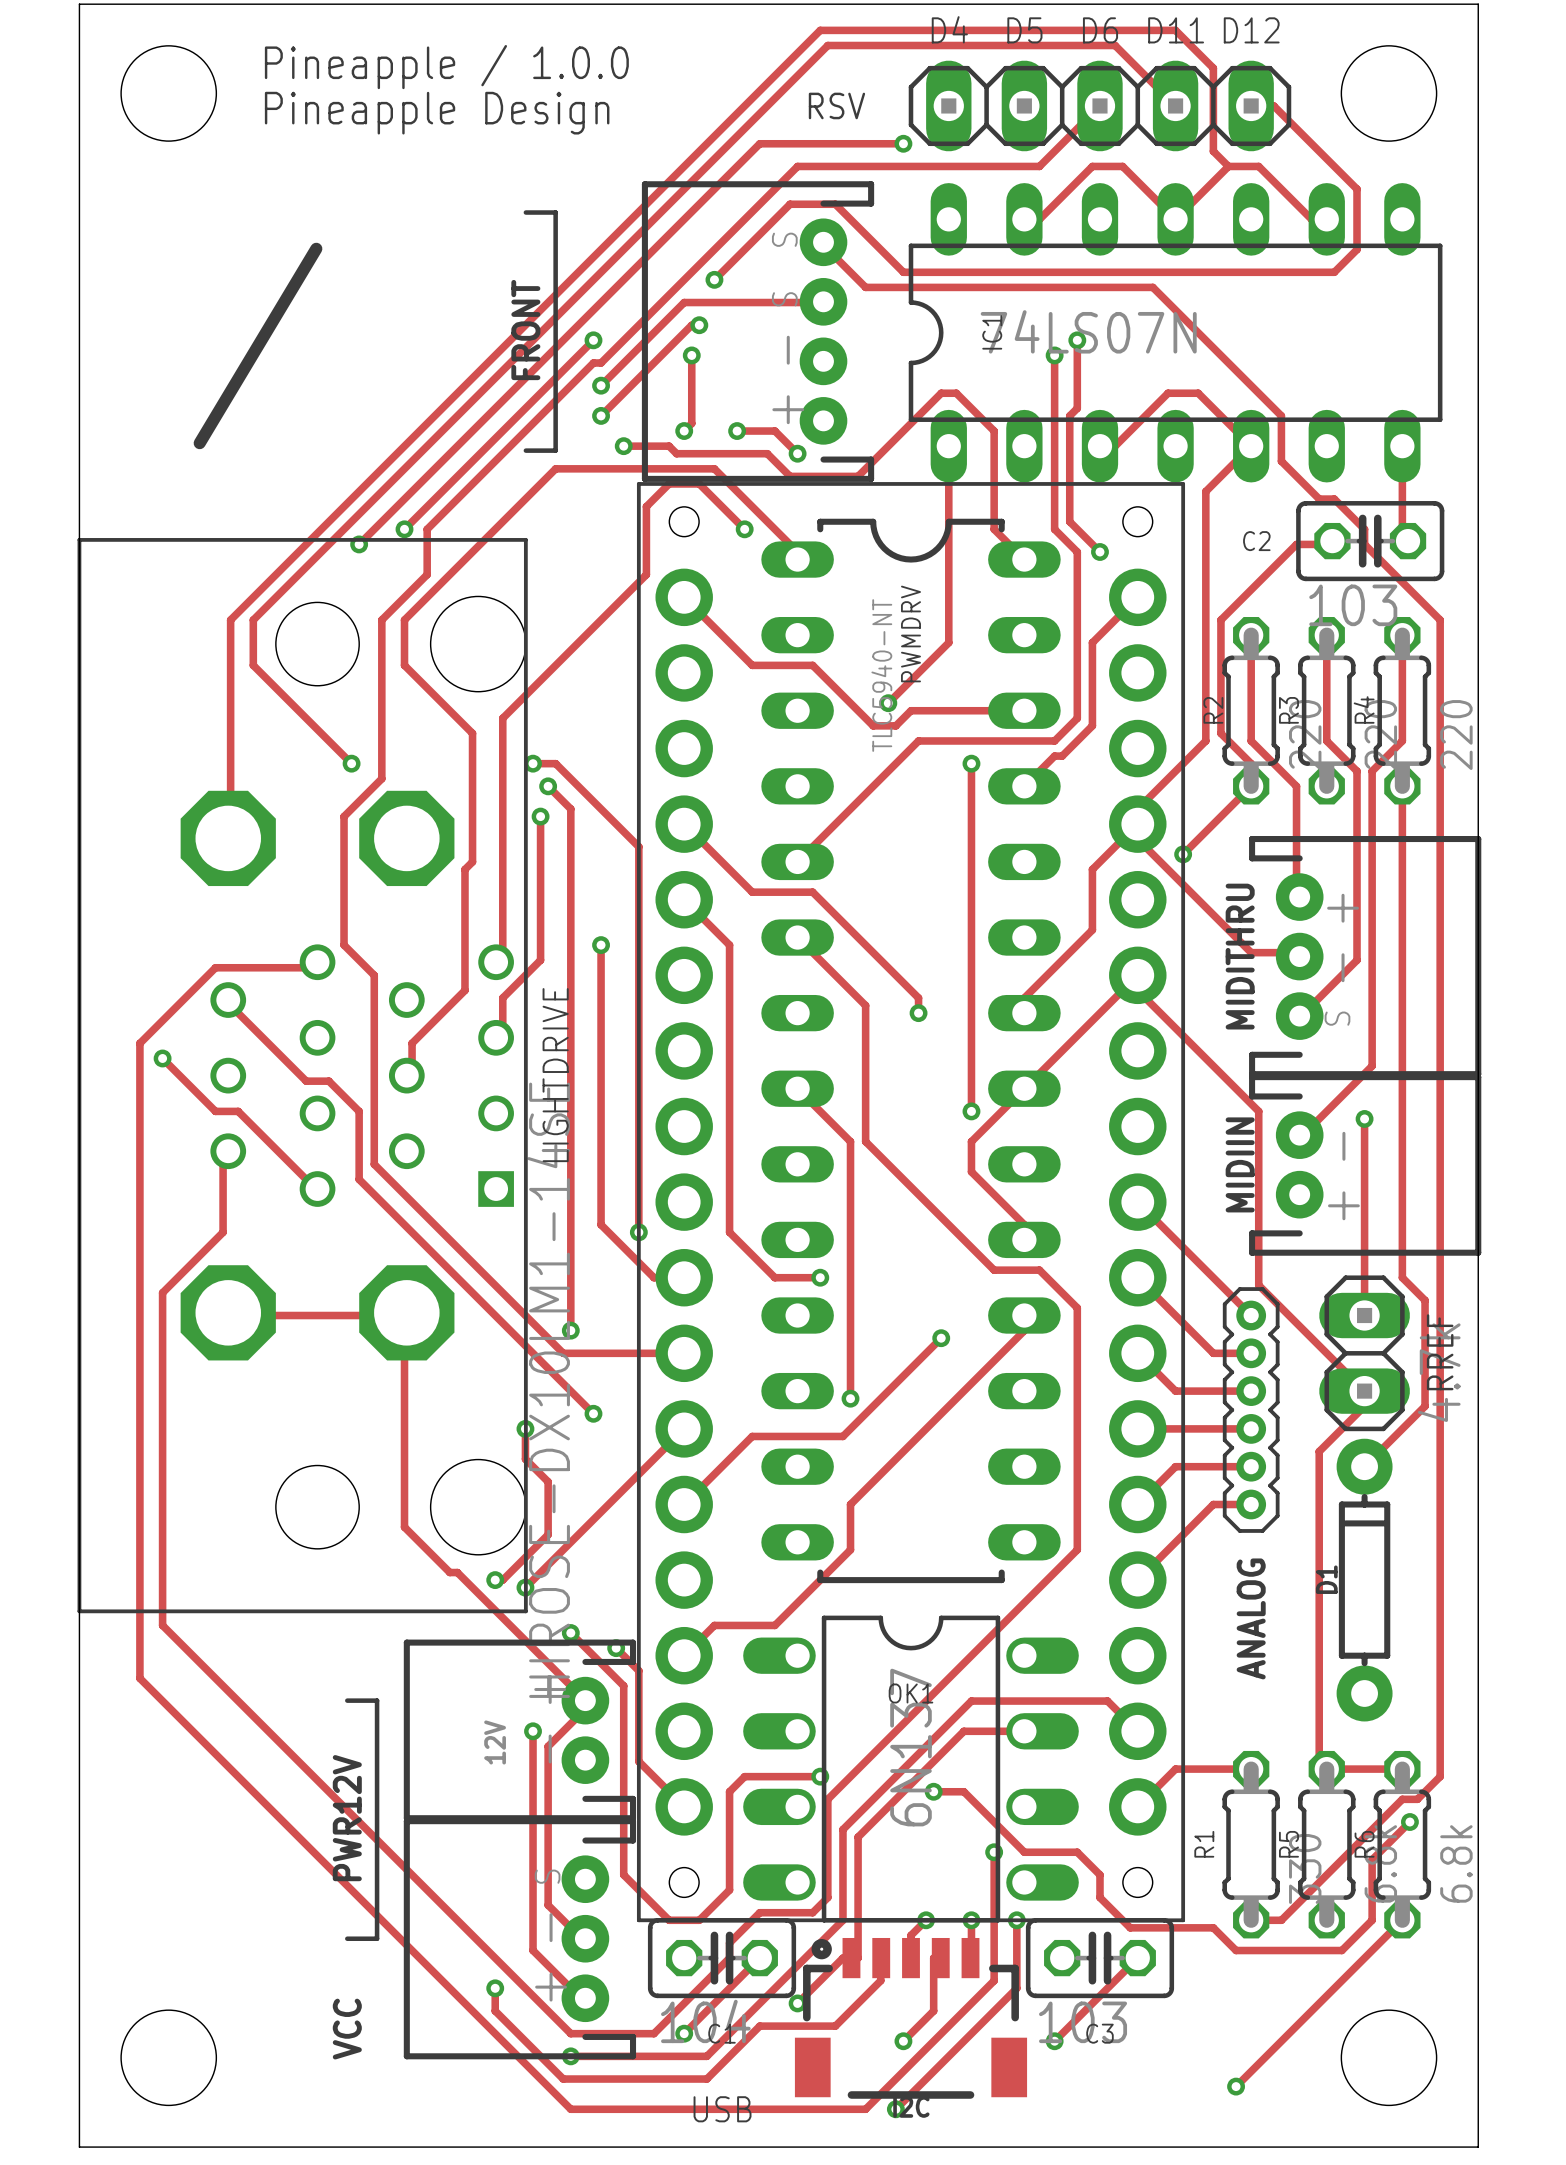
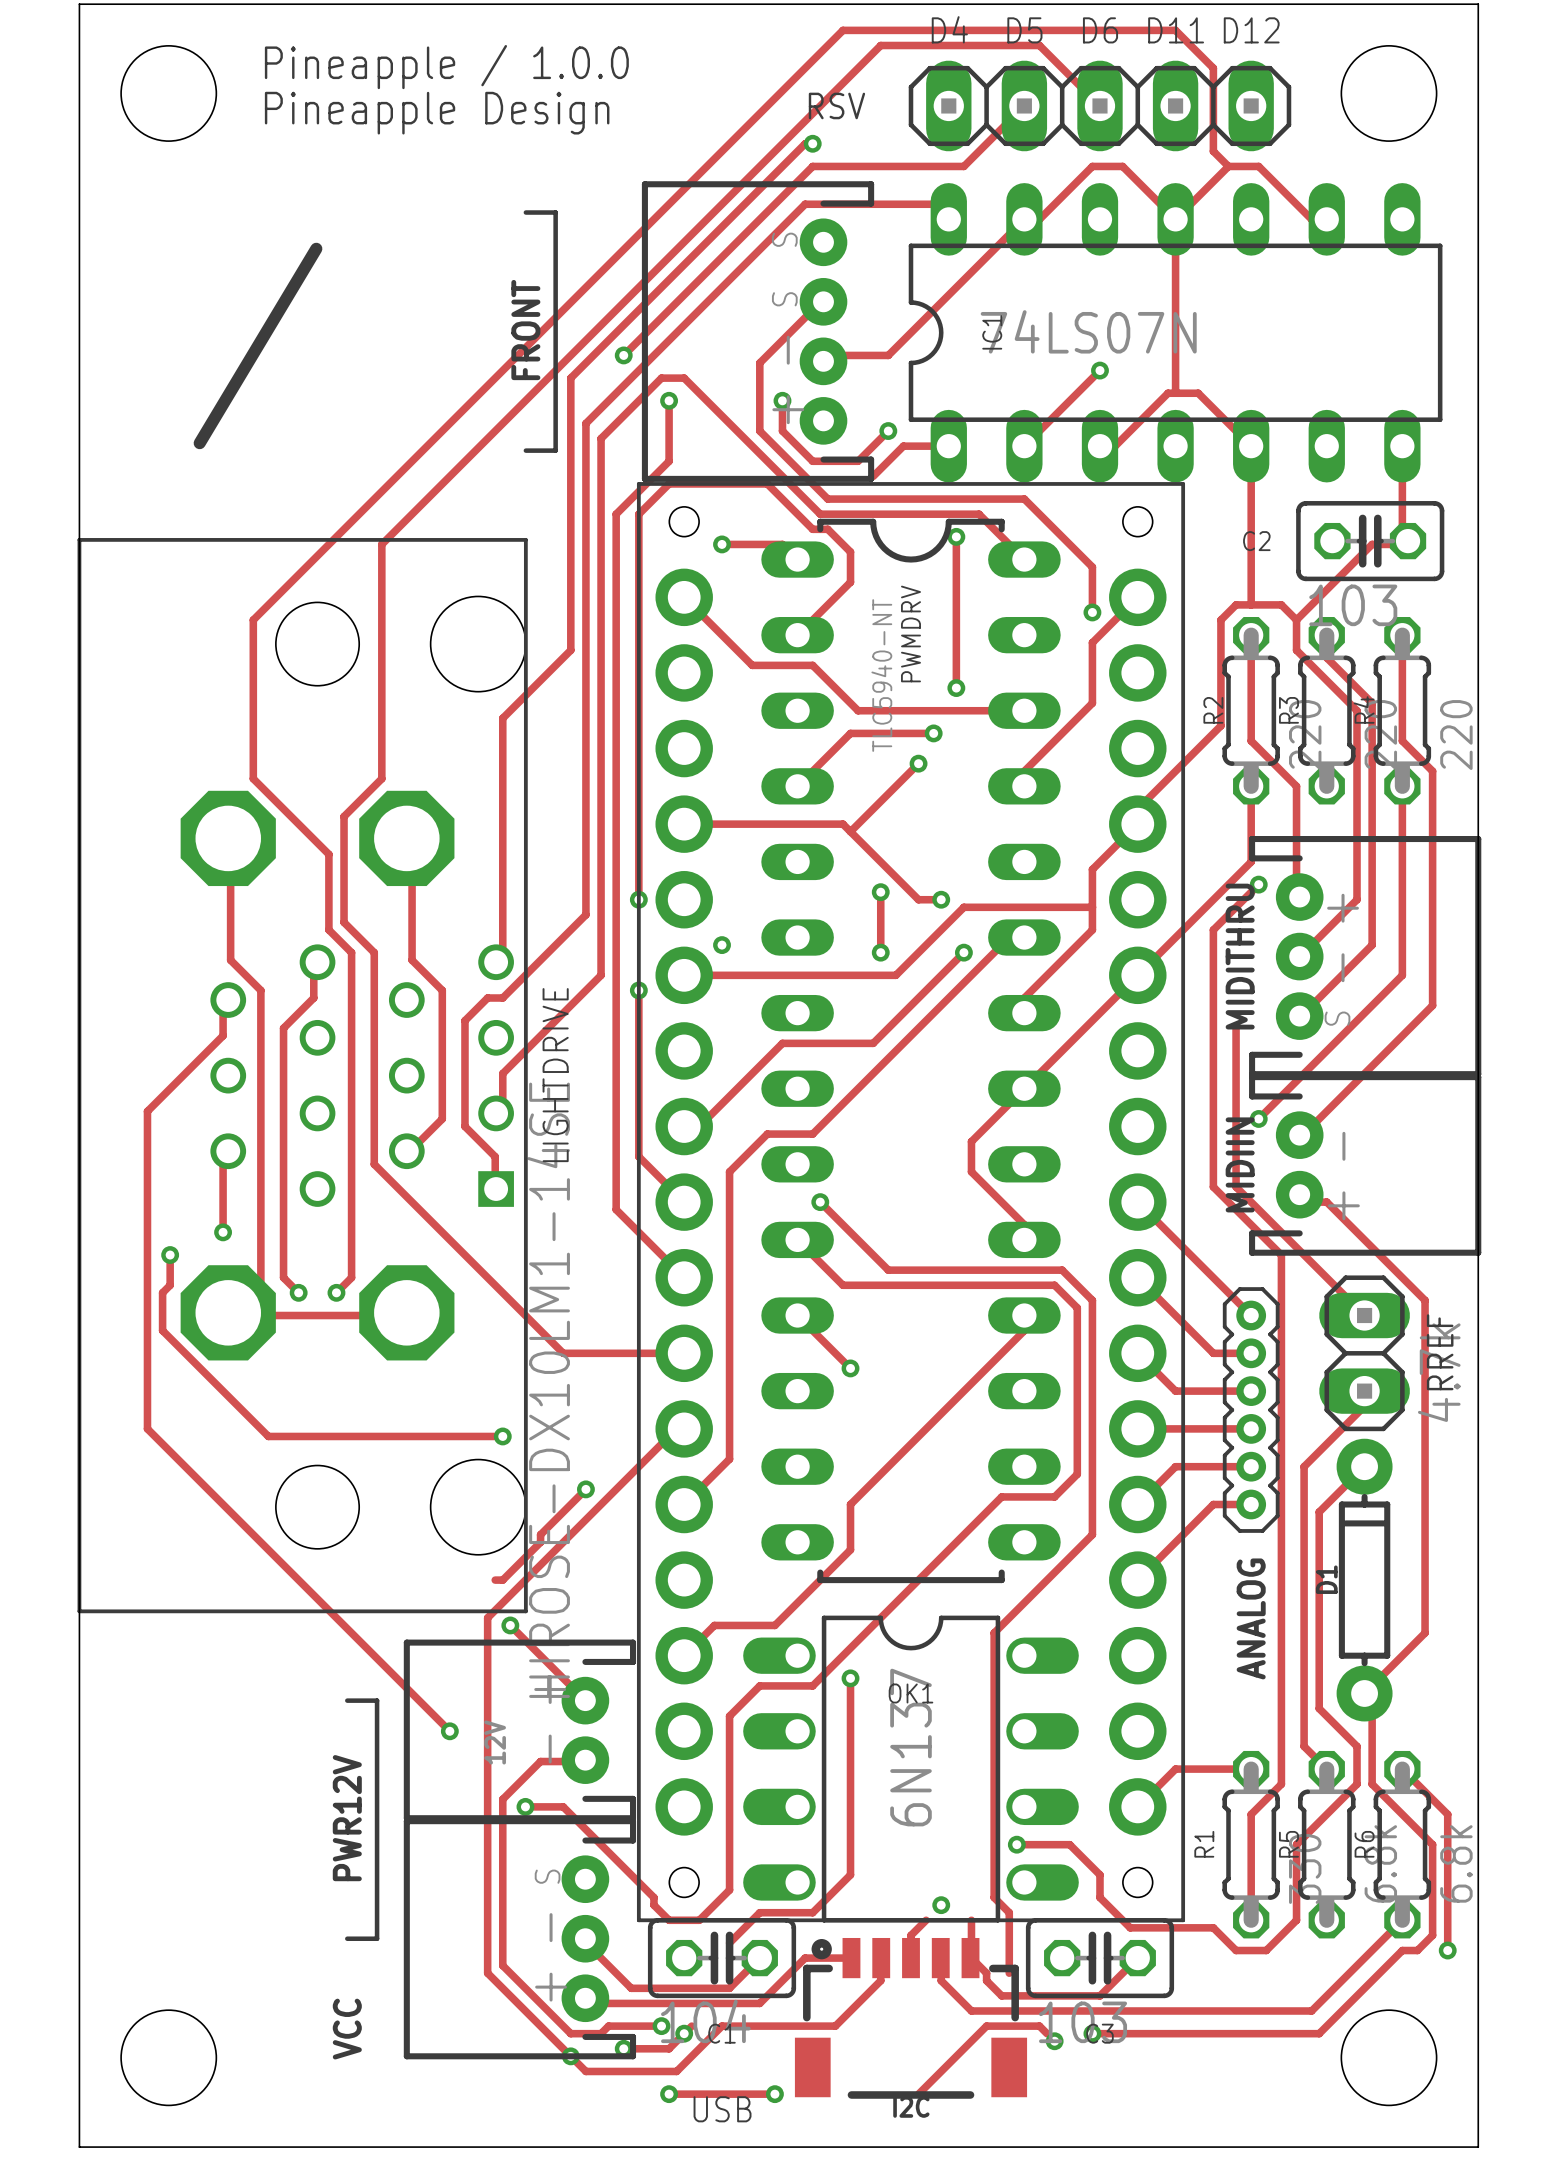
track: (842, 30) (820, 30) (230, 620) (230, 831) (228, 838) -> (228, 1312) (260, 1315) (260, 990) (230, 960) (230, 839) (228, 838)
track: (827, 45) (880, 45) -> (827, 45) (842, 30)
track: (1039, 45) (1115, 45) (1175, 105) -> (1039, 45) (1099, 105)
track: (1099, 105) (1039, 166) (963, 166) -> (1024, 105) (963, 166)
track: (1251, 105) (1273, 105) (1357, 189) (1357, 249) (1334, 272) (903, 272) (835, 204) -> (948, 219) (933, 204) (835, 204)
track: (805, 143) (759, 143) (359, 544) -> (805, 143) (570, 378) (570, 650)
track: (812, 143) (903, 143) -> none
via: none -> (812, 143)
via: (903, 143) -> none
track: (812, 166) (797, 166) (601, 363) (593, 363) (427, 529) (427, 574) (381, 620) -> (880, 45) (381, 544) (381, 620)
track: (805, 204) (790, 204) (714, 279) -> none
track: none -> (1024, 219) (888, 355) (827, 355) (823, 361)
track: none -> (1175, 219) (1175, 393)
track: (823, 242) (827, 249) (865, 287) (1152, 287) (1281, 415) (1281, 461) (1319, 499) (1334, 499) (1364, 529) (1364, 544) (1440, 620) (1440, 1776) (1417, 1799) (1402, 1799) (1281, 1920) (1251, 1920) -> (1258, 884) (1213, 929) (1213, 1187) (1281, 1255) (1281, 1784) (1251, 1814) (1251, 1920)
via: (714, 279) -> none
track: (820, 302) (684, 302) (601, 385) -> none
track: (699, 325) (691, 325) (601, 415) -> none
via: (699, 325) -> none
track: (593, 340) (404, 529) -> (812, 166) (623, 355)
via: (593, 340) -> none
track: (1077, 340) (1077, 408) (1069, 415) (1069, 521) (1099, 551) -> none
via: (1077, 340) -> none
via: none -> (623, 355)
track: (691, 355) (691, 423) (684, 431) -> none
via: (691, 355) -> none
track: (1054, 355) (1054, 529) -> (820, 302) (759, 363) (759, 431) (827, 499) (1024, 499) (1054, 529)
via: (1054, 355) -> none
track: none -> (1099, 370) (1024, 446)
via: none -> (1099, 370)
via: (601, 385) -> none
track: none -> (669, 400) (669, 461) (616, 514) (616, 1209) (684, 1277)
via: none -> (669, 400)
track: none -> (782, 400) (782, 431) (812, 461) (858, 461) (888, 431)
via: none -> (782, 400)
via: (601, 415) -> none
via: (684, 431) -> none
track: (737, 431) (774, 431) (797, 453) -> none
via: (737, 431) -> none
via: none -> (888, 431)
track: (623, 446) (669, 446) (676, 453) (767, 453) (790, 476) (858, 476) (941, 393) (956, 393) (994, 431) (994, 529) -> (601, 945) (601, 438) (661, 378) (684, 378) (820, 514) (979, 514) (994, 529)
via: (623, 446) -> none
track: (948, 446) (948, 642) (888, 703) -> (948, 446) (903, 446) (873, 476)
track: (1251, 446) (1205, 491) (1205, 740) -> (1251, 446) (1251, 604)
via: (797, 453) -> none
track: (699, 483) (744, 529) -> (699, 483) (767, 483) (812, 529) (827, 529) (850, 551) (850, 582) (797, 635)
track: (646, 506) (646, 574) (570, 650) -> (646, 506) (638, 514) (638, 846)
via: (404, 529) -> none
via position: (744, 529) -> (722, 544)
track: none -> (956, 536) (956, 688)
via: none -> (956, 536)
track: (1332, 541) (1326, 544) (1296, 544) (1236, 604) -> (1296, 620) (1281, 604) (1236, 604)
track: none -> (1408, 541) (1402, 544) (1372, 544) (1296, 620)
via: (359, 544) -> none
track: (1077, 551) (1077, 718) -> (1077, 551) (1092, 567) (1092, 612)
via position: (1099, 551) -> (1092, 612)
track: (797, 559) (797, 551) (714, 468) (555, 468) (404, 620) (404, 665) (472, 733) (472, 861) (464, 869) (464, 990) (412, 1043) (412, 1073) (406, 1075) -> (797, 559) (782, 544) (722, 544)
track: none -> (1296, 620) (1296, 650) (1357, 710) (1357, 771)
track: (1326, 657) (1326, 740) (1357, 771) -> (1326, 657) (1372, 703) (1372, 771)
track: (253, 665) (351, 763) -> (253, 665) (253, 778) (328, 854) (328, 929) (344, 945)
via: none -> (956, 688)
via: (888, 703) -> none
track: (1092, 703) (1092, 725) (1062, 756) (1054, 756) (1024, 786) -> (1054, 740) (1024, 771) (1024, 786)
track: none -> (1092, 703) (1077, 718)
track: (858, 710) (873, 725) (895, 725) (910, 710) -> (858, 710) (910, 710)
track: (1220, 725) (1220, 733) (1251, 763) (1251, 786) (1183, 854) -> (1220, 725) (1205, 740)
track: none -> (933, 733) (850, 733) (797, 786)
via: none -> (933, 733)
track: (1054, 740) (918, 740) (797, 861) -> none
track: (1402, 740) (1372, 771) -> none
via: (351, 763) -> none
track: (533, 763) (555, 763) (638, 846) -> none
via: (533, 763) -> none
track: none -> (918, 763) (850, 831)
via: none -> (918, 763)
track: (971, 763) (971, 1111) -> none
via: (971, 763) -> none
track: (548, 786) (570, 809) (570, 1330) -> none
via: (548, 786) -> none
track: none -> (1251, 786) (1251, 861) (1137, 975)
track: (540, 816) (540, 960) -> (805, 204) (585, 423) (585, 914) (540, 960)
via: (540, 816) -> none
track: (684, 824) (752, 892) (812, 892) (918, 998) (918, 1013) -> (684, 824) (842, 824) (918, 899) (941, 899)
track: (1130, 831) (1251, 952) (1296, 952) (1299, 956) -> (1357, 899) (1299, 956)
track: none -> (406, 838) (412, 839) (412, 960) (442, 990) (442, 1118) (412, 1149) (406, 1151)
via position: (1183, 854) -> (1258, 884)
track: none -> (880, 892) (880, 952)
via: none -> (880, 892)
track: (638, 899) (638, 990) -> none
via: none -> (638, 899)
track: (684, 899) (729, 945) (729, 1171) -> (1024, 937) (1009, 937) (812, 1134) (767, 1134) (729, 1171)
via: none -> (941, 899)
track: (1357, 899) (1357, 960) -> (1372, 945) (1357, 960)
track: none -> (1092, 907) (963, 907) (895, 975) (684, 975)
track: (344, 922) (344, 945) -> none
track: (797, 937) (865, 1005) (865, 1141) (994, 1270) -> (820, 1202) (888, 1270) (994, 1270)
via: (601, 945) -> none
via: none -> (722, 945)
track: (1372, 945) (1372, 1066) -> (1402, 740) (1432, 771) (1432, 1005) (1372, 1066)
track: (351, 952) (374, 975) -> (344, 922) (374, 952) (374, 975)
track: none -> (351, 952) (351, 1277) (336, 1292)
via: none -> (880, 952)
track: none -> (963, 952) (873, 1043) (782, 1043) (699, 1126) (684, 1126)
via: none -> (963, 952)
track: (313, 967) (215, 967) (139, 1043) (139, 1678) (570, 2109) (865, 2109) (994, 1980) (994, 1897) -> (313, 967) (313, 998) (283, 1028) (283, 1277) (298, 1292)
track: (601, 975) (601, 1224) (653, 1277) (684, 1277) -> (601, 975) (502, 1073) (502, 1111) (496, 1113)
track: (1402, 975) (1402, 1277) -> (1402, 975) (1258, 1118)
track: (1130, 982) (1258, 1111) (1258, 1285) (1364, 1391) -> none
via: none -> (638, 990)
track: (502, 998) (502, 1035) (496, 1037) -> (502, 998) (487, 998) (464, 1020) (464, 1126) (495, 1156) (496, 1189)
track: (228, 1000) (230, 1005) (306, 1081) (328, 1081) (359, 1111) (359, 1179) (593, 1413) -> (228, 1000) (223, 1005) (223, 1035) (147, 1111) (147, 1428) (449, 1731)
via: (918, 1013) -> none
track: (162, 1058) (215, 1111) (238, 1111) (317, 1189) -> none
via: (162, 1058) -> none
track: (797, 1088) (850, 1141) (850, 1398) -> none
via: (971, 1111) -> none
track: (1364, 1118) (1364, 1315) -> (1236, 1028) (1236, 1187) (1364, 1315)
via position: (1364, 1118) -> (1258, 1118)
track: (638, 1156) (638, 1232) -> (638, 1156) (684, 1202)
track: none -> (1299, 1194) (1304, 1202) (1326, 1202) (1402, 1277)
via: none -> (820, 1202)
track: (223, 1232) (170, 1285) -> (170, 1255) (170, 1285)
via: none -> (223, 1232)
via: (638, 1232) -> none
track: (729, 1232) (774, 1277) (820, 1277) -> (729, 1232) (729, 1459)
via: none -> (170, 1255)
track: (1039, 1270) (1054, 1285) -> (797, 1239) (842, 1285) (1054, 1285)
via: (820, 1277) -> none
via: none -> (298, 1292)
via: none -> (336, 1292)
track: (404, 1315) (404, 1527) (449, 1572) (457, 1572) (510, 1625) -> none
track: none -> (797, 1315) (850, 1368)
track: (162, 1330) (162, 1625) (502, 1965) -> (162, 1330) (268, 1436) (502, 1436)
via: (570, 1330) -> none
track: (941, 1338) (842, 1436) (752, 1436) (729, 1459) -> none
via: (941, 1338) -> none
via position: (850, 1398) -> (850, 1368)
track: (1425, 1406) (1364, 1466) -> (1425, 1406) (1425, 1633) (1364, 1693) (1372, 1701) (1372, 1784) (1432, 1844) (1432, 1935) (1417, 1950) (1402, 1950) (1319, 2033) (1092, 2033)
via: (593, 1413) -> none
track: (525, 1428) (525, 1459) (548, 1481) (548, 1534) (540, 1542) -> (585, 1489) (540, 1534) (540, 1542)
via position: (525, 1428) -> (502, 1436)
track: (684, 1428) (525, 1587) -> (684, 1428) (676, 1428) (487, 1617) (487, 1973) (585, 2071) (676, 2071) (722, 2026) (759, 2026)
track: (1319, 1451) (1319, 1512) -> (1364, 1466) (1319, 1512)
track: (1077, 1474) (1077, 1549) -> (1039, 1270) (1062, 1270) (1092, 1300) (1092, 1534) (1077, 1549)
via: none -> (585, 1489)
via: (495, 1580) -> none
via: (525, 1587) -> none
via: none -> (510, 1625)
track: (570, 1633) (623, 1685) (623, 1874) (653, 1905) -> (525, 1806) (563, 1806) (653, 1897) (653, 1905)
via: (570, 1633) -> none
track: (994, 1633) (827, 1799) (827, 1897) -> (850, 1678) (850, 1874) (827, 1897)
track: none -> (994, 1633) (994, 1852)
track: (616, 1648) (638, 1670) (638, 1761) (684, 1806) -> none
via: (616, 1648) -> none
via: none -> (850, 1678)
track: (585, 1700) (578, 1701) (578, 1716) (548, 1746) (548, 1905) (578, 1935) (585, 1938) -> none
track: (1319, 1708) (1319, 1761) -> (1319, 1451) (1304, 1466) (1304, 1746) (1319, 1761)
via: none -> (449, 1731)
track: (533, 1731) (533, 1950) (578, 1995) (585, 1998) -> none
via: (533, 1731) -> none
track: (1024, 1731) (963, 1731) (858, 1837) (858, 1958) (851, 1958) -> none
track: (1137, 1731) (1107, 1701) (971, 1701) (842, 1829) (842, 1920) (805, 1958) -> none
track: none -> (585, 1760) (540, 1761) (502, 1799) (502, 1965)
track: (1326, 1769) (1402, 1769) -> (1447, 1950) (1447, 1814) (1402, 1769)
track: (820, 1776) (744, 1776) (729, 1791) -> (1077, 1474) (1054, 1496) (1001, 1496) (812, 1685) (759, 1685) (729, 1716) (729, 1791)
via: (820, 1776) -> none
track: (933, 1791) (963, 1791) (1024, 1852) (1077, 1852) -> (1016, 1844) (1069, 1844) (1077, 1852)
via: (933, 1791) -> none
via: none -> (525, 1806)
track: (1409, 1822) (1372, 1859) (1372, 1920) (1341, 1950) (1266, 1950) -> (1319, 1708) (1357, 1746) (1357, 1784) (1296, 1844) (1296, 1920) (1266, 1950)
via: (1409, 1822) -> none
via position: (994, 1852) -> (1016, 1844)
track: none -> (994, 1897) (1009, 1912) (1009, 1973)
via position: (926, 1920) -> (941, 1905)
via: (971, 1920) -> none
track: (1016, 1920) (1016, 1988) (895, 2109) -> none
via: (1016, 1920) -> none
track: (729, 1942) (729, 1958) (653, 2033) (601, 2033) -> (661, 2026) (608, 2026) (601, 2033)
via: none -> (1447, 1950)
track: (842, 1958) (797, 2003) -> (842, 1958) (805, 1958)
track: (940, 1958) (933, 1958) (933, 2011) (903, 2041) -> none
track: (495, 1988) (495, 2011) (563, 2079) (706, 2079) (759, 2026) -> none
via: (495, 1988) -> none
track: (729, 1988) (691, 2026) -> (729, 1988) (631, 1988) (585, 1942) (585, 1938)
track: (1099, 1995) (1054, 2041) -> (1099, 1995) (1001, 1995) (986, 1980) (986, 1973) (971, 1958)
track: (759, 2003) (706, 2056) (570, 2056) -> (759, 2003) (585, 2003) (585, 1998)
via: (797, 2003) -> none
track: (1311, 2011) (1236, 2086) -> (1311, 2011) (971, 2011) (941, 1980) (941, 1958)
via: none -> (661, 2026)
track: none -> (684, 2033) (669, 2048) (623, 2048)
track: none -> (1047, 2033) (1039, 2026) (986, 2026) (918, 2094)
via: none -> (1092, 2033)
via: (903, 2041) -> none
via: none -> (623, 2048)
via: (1236, 2086) -> none
track: none -> (669, 2094) (774, 2094)
via: none -> (669, 2094)
via: none -> (774, 2094)
via: (895, 2109) -> none

